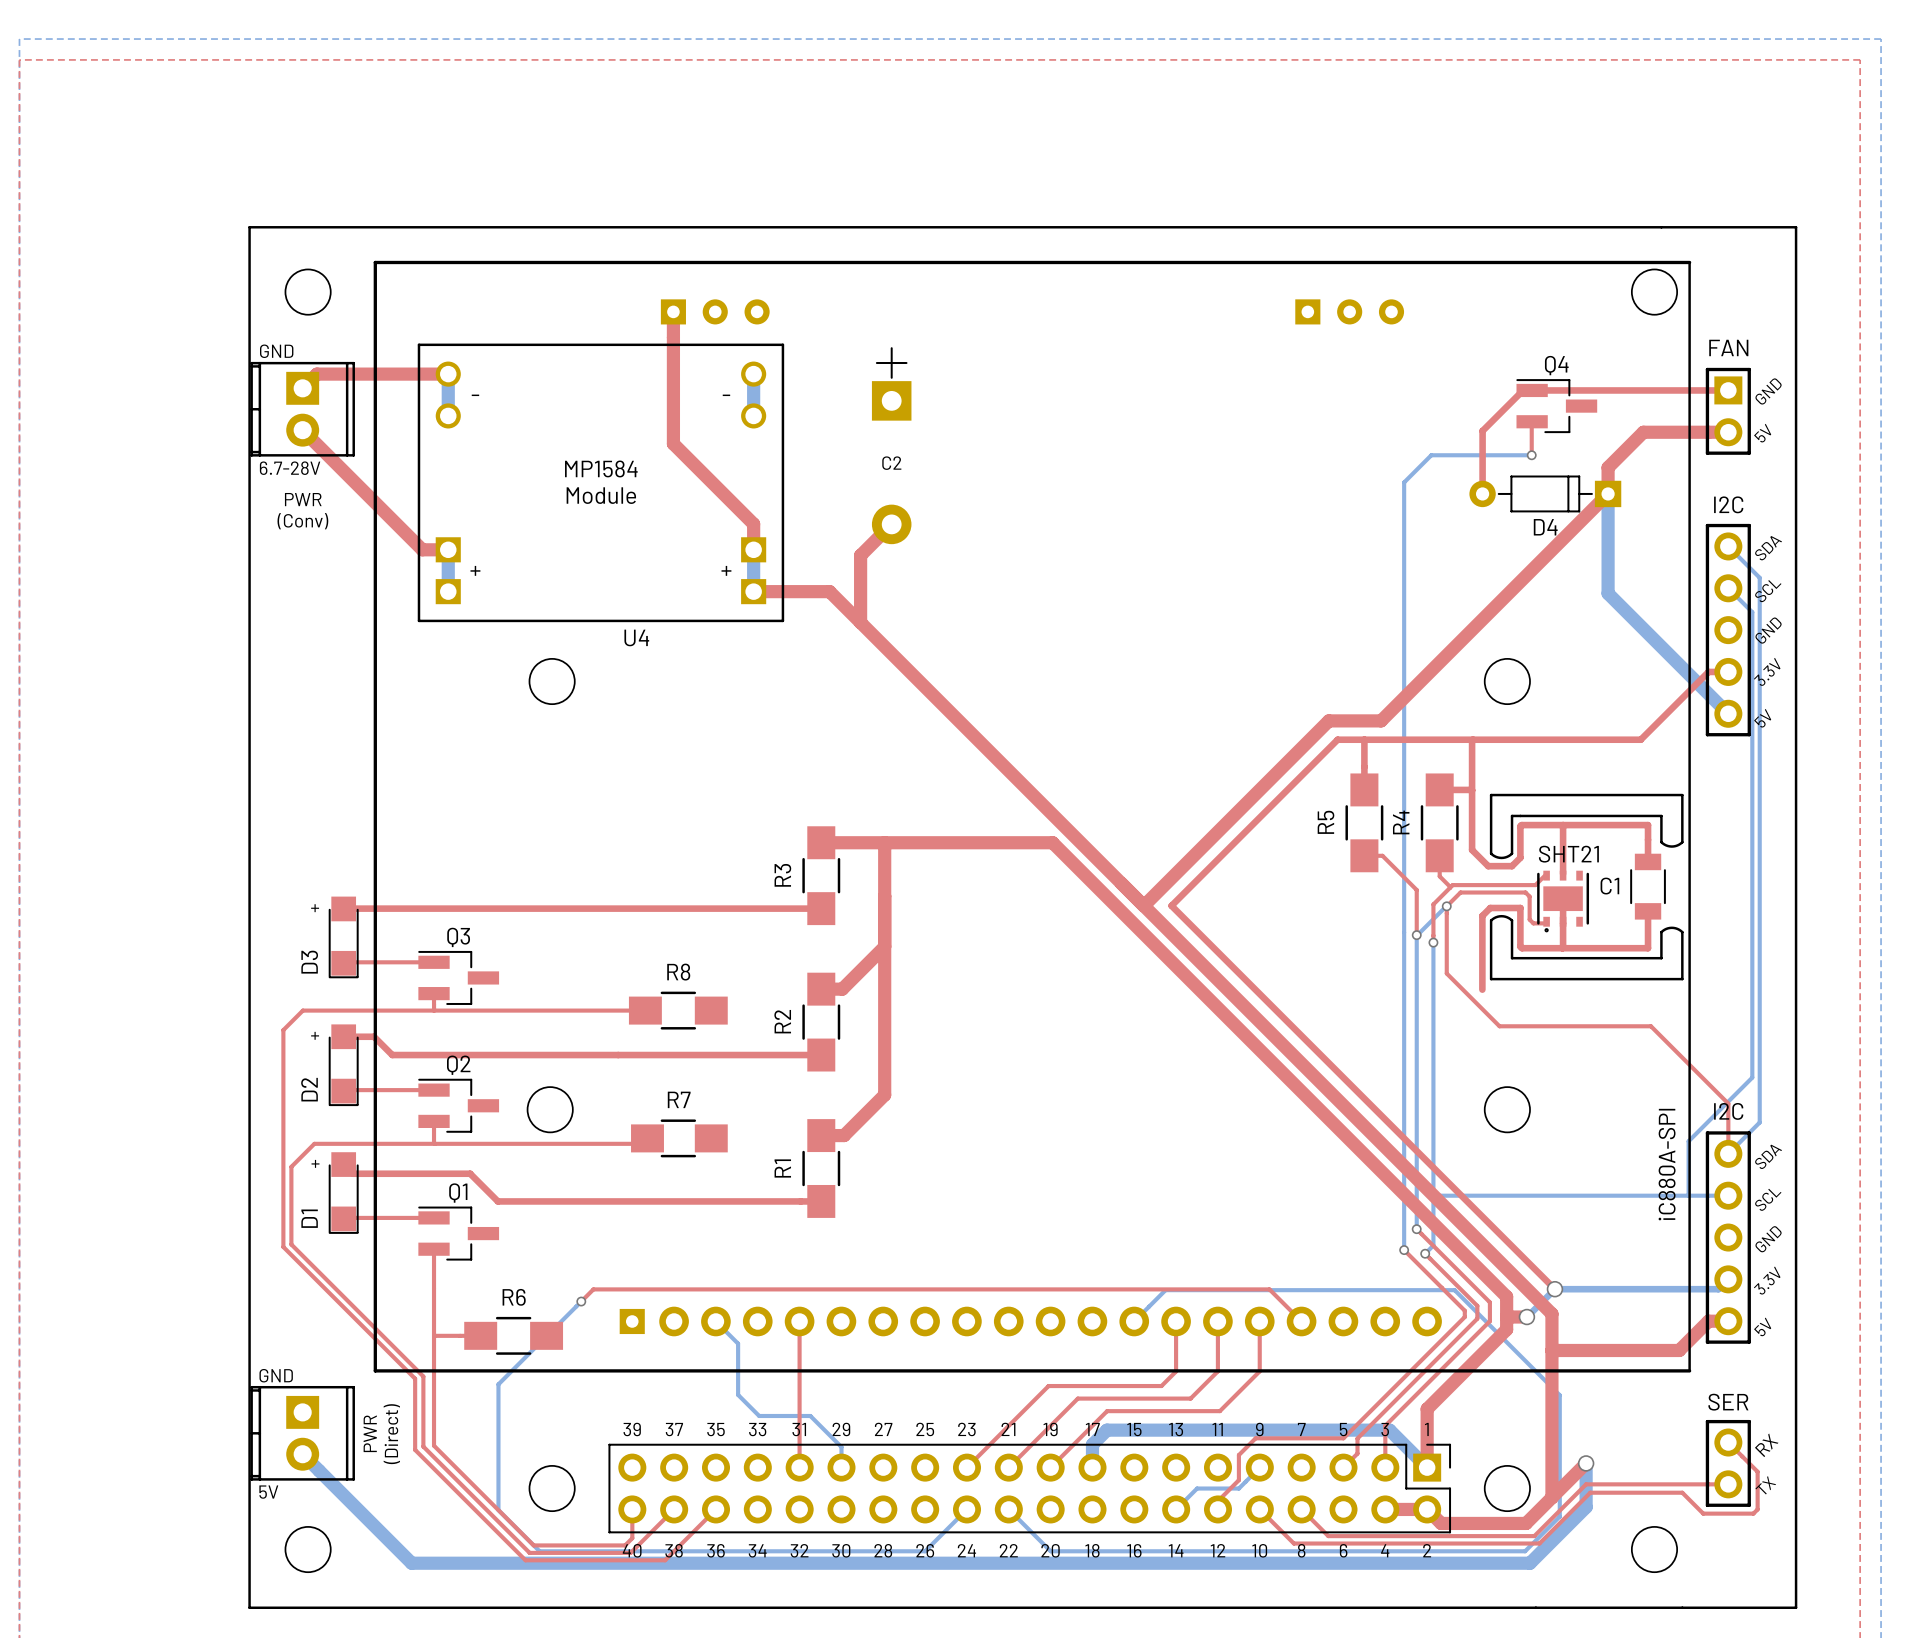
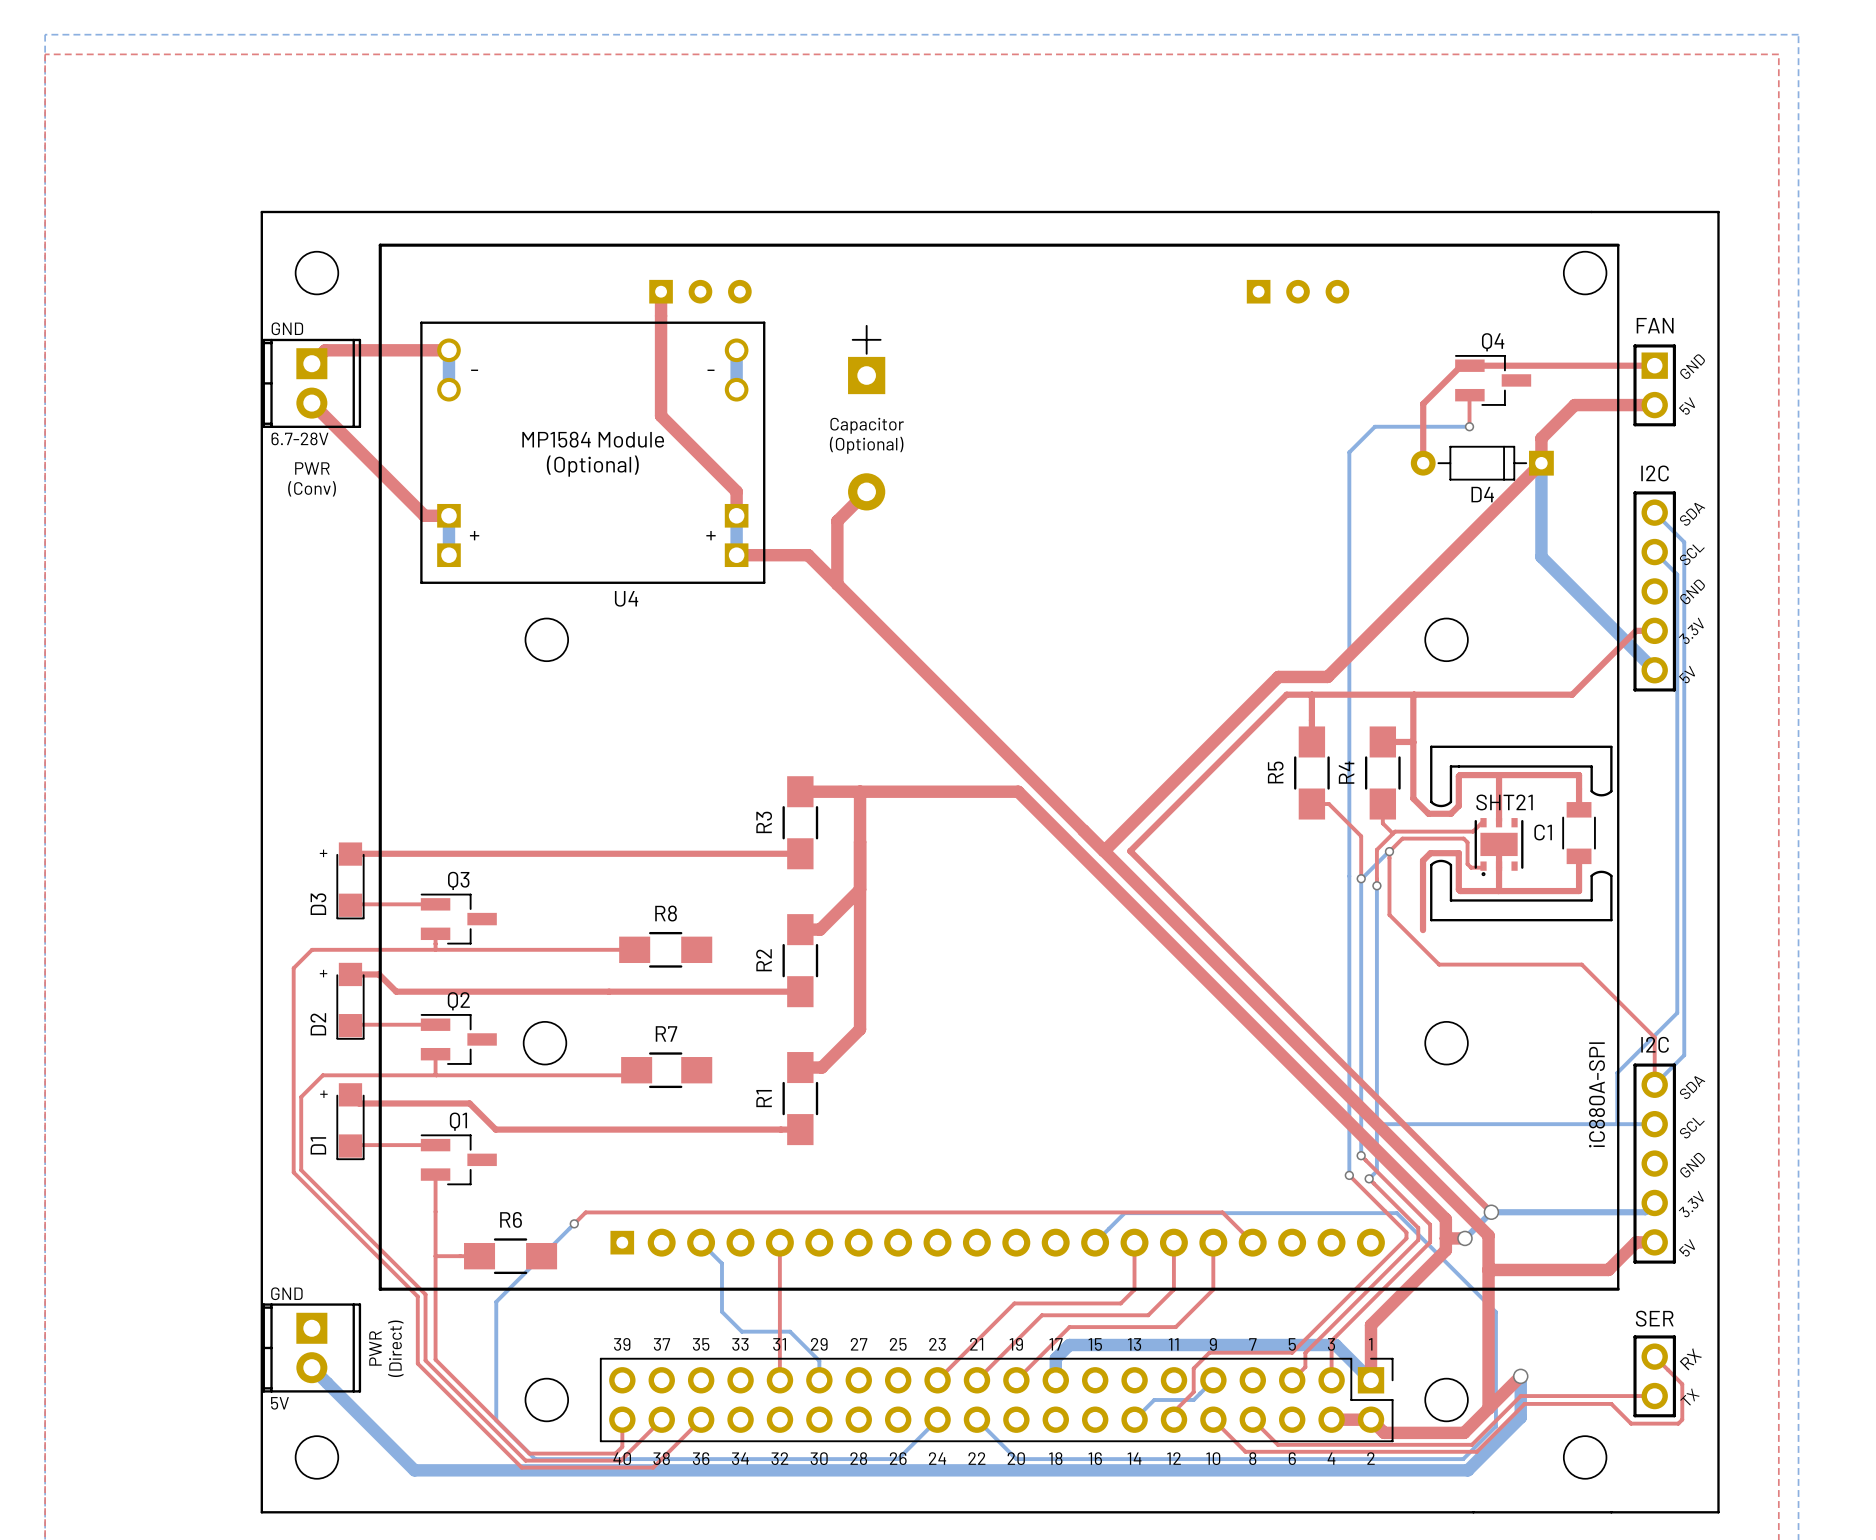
text: none -> Capacitor (867, 425)
text: C2 (891, 463) -> none
text: MP1584 (601, 468) -> MP1584 Module (593, 439)
text: none -> (Optional) (866, 445)
text: Module (601, 495) -> (Optional) (592, 466)

